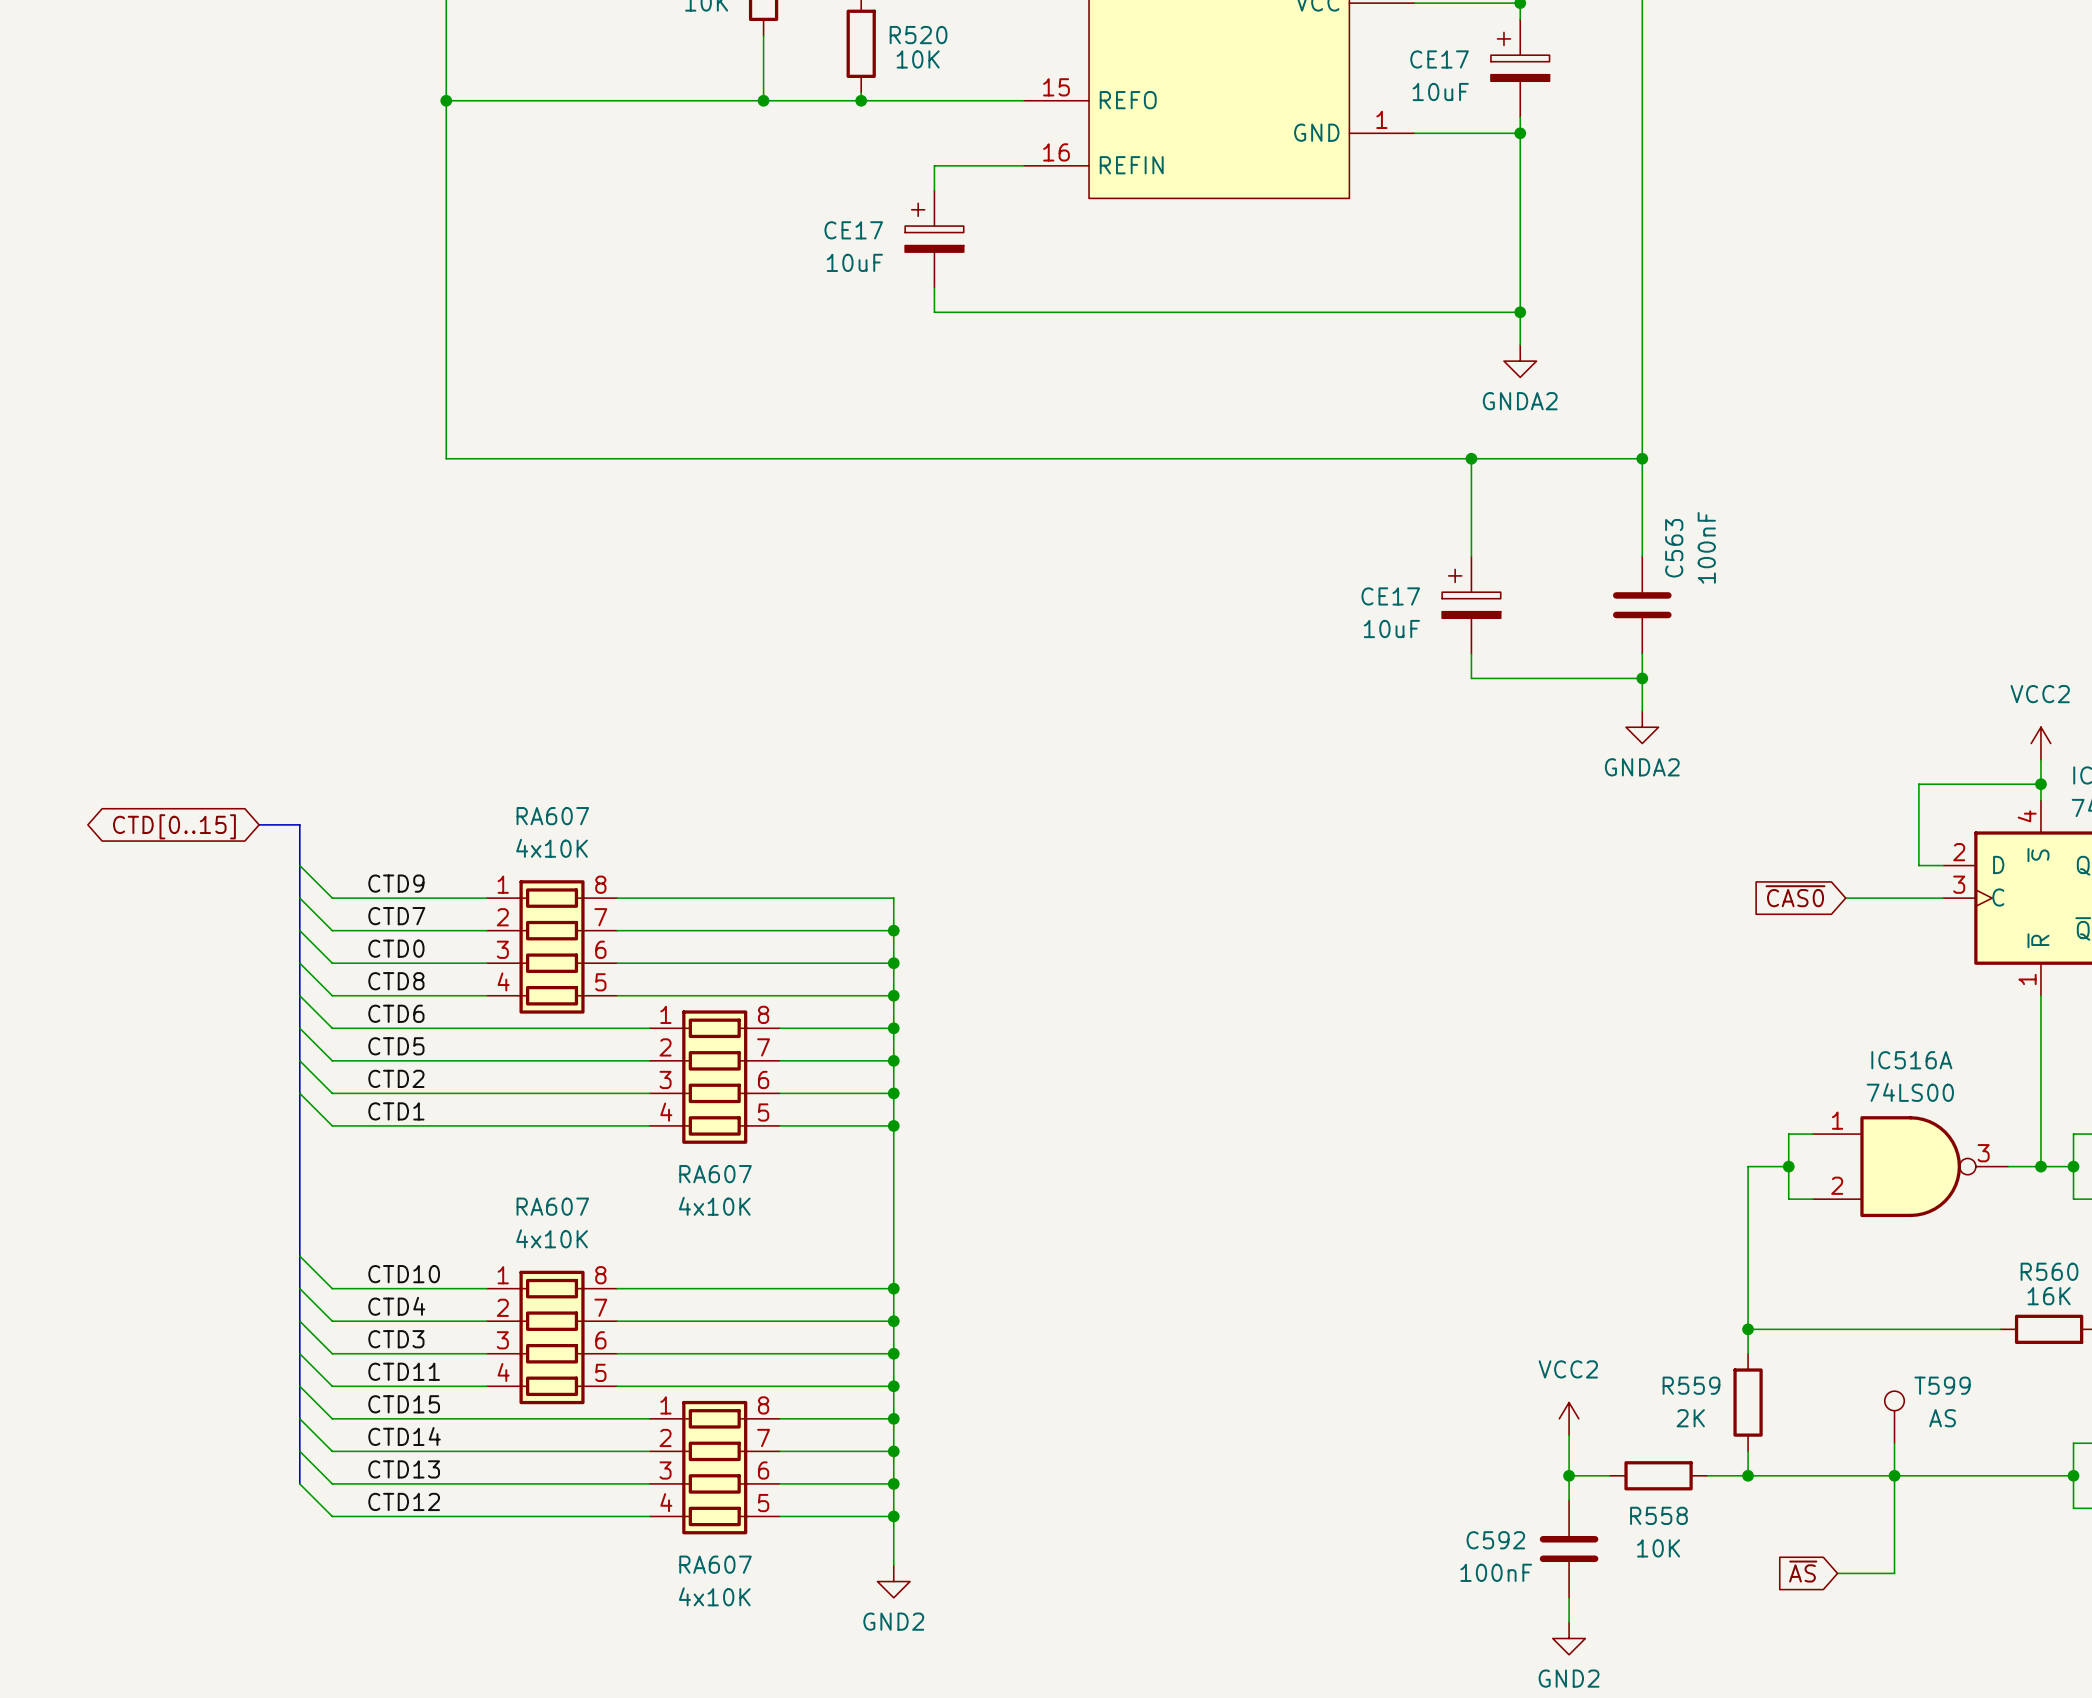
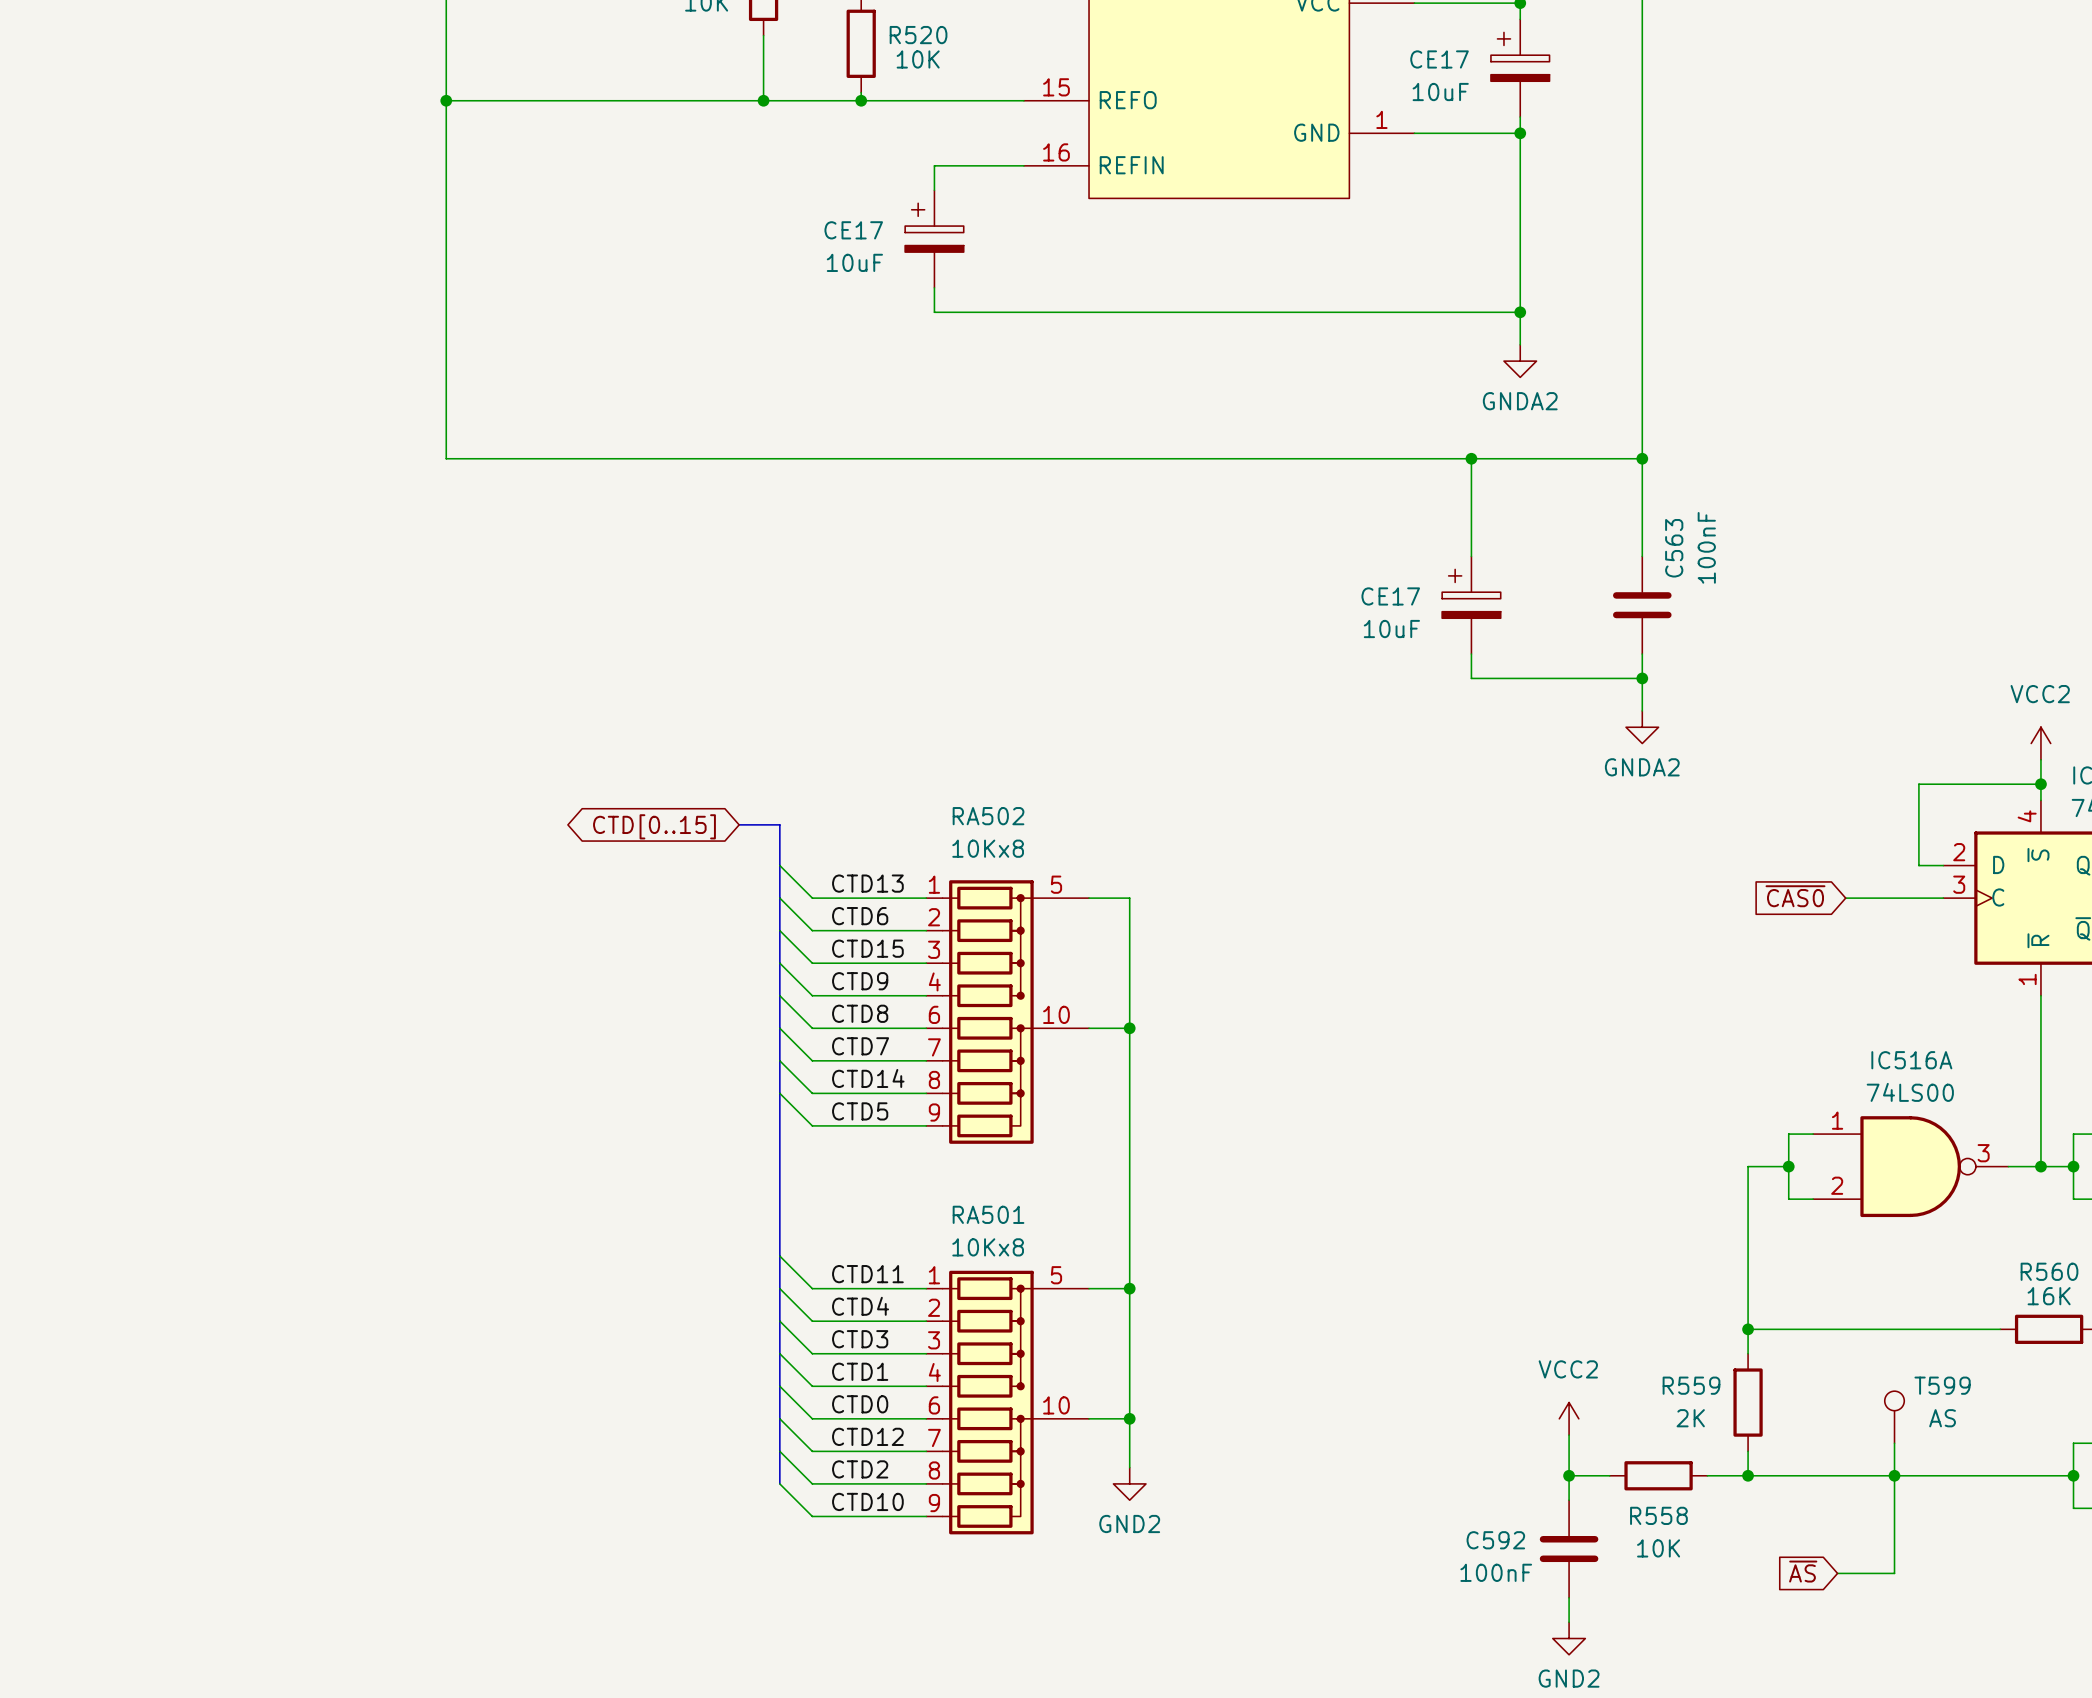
bus: (259, 824) (299, 824) (299, 1483) -> none
bus: none -> (739, 824) (779, 824) (779, 1483)
global label: CTD[0..15] (174, 826) -> none
global label: none -> CTD[0..15] (654, 826)
wire: (299, 865) (332, 898) (486, 898) -> none
label: CTD9 (396, 883) -> none
label: none -> CTD13 (867, 883)
wire: (299, 898) (332, 930) (486, 930) -> none
wire: (617, 898) (812, 898) -> (779, 865) (812, 898)
wire: (893, 898) (893, 1565) -> (893, 898) (926, 898)
wire: none -> (1089, 898) (1129, 898) (1129, 1467)
label: CTD7 (396, 916) -> none
label: none -> CTD6 (860, 916)
wire: (299, 930) (332, 963) (486, 963) -> none
wire: (617, 930) (812, 930) -> (779, 898) (812, 930)
wire: none -> (893, 930) (926, 930)
junction: (893, 930) -> none
RA607: 4x10K (552, 946) -> none
label: CTD0 (396, 948) -> none
label: none -> CTD15 (867, 948)
wire: (299, 963) (332, 995) (486, 995) -> none
wire: (617, 963) (812, 963) -> (779, 930) (812, 963)
wire: none -> (893, 963) (926, 963)
junction: (893, 963) -> none
label: CTD8 (396, 981) -> none
label: none -> CTD9 (860, 981)
wire: (299, 995) (332, 1028) (649, 1028) -> none
wire: (617, 995) (812, 995) -> (779, 963) (812, 995)
wire: none -> (893, 995) (926, 995)
junction: (893, 995) -> none
RA502: none -> 10Kx8 (1007, 1012)
label: CTD6 (396, 1013) -> none
label: none -> CTD8 (860, 1013)
wire: (299, 1028) (332, 1060) (649, 1060) -> none
wire: (779, 1028) (812, 1028) -> (779, 995) (812, 1028)
wire: none -> (893, 1028) (926, 1028)
junction: (893, 1028) -> none
wire: none -> (1089, 1028) (1129, 1028)
junction: none -> (1129, 1028)
label: CTD5 (396, 1046) -> none
label: none -> CTD7 (860, 1046)
wire: (299, 1060) (332, 1093) (649, 1093) -> none
wire: (779, 1060) (812, 1060) -> (779, 1028) (812, 1060)
wire: none -> (893, 1060) (926, 1060)
junction: (893, 1060) -> none
RA607: 4x10K (714, 1077) -> none
label: CTD2 (396, 1078) -> none
label: none -> CTD14 (868, 1078)
wire: (299, 1093) (332, 1125) (649, 1125) -> none
wire: (779, 1093) (812, 1093) -> (779, 1060) (812, 1093)
wire: none -> (893, 1093) (926, 1093)
junction: (893, 1093) -> none
label: CTD1 (396, 1111) -> none
label: none -> CTD5 (860, 1111)
wire: (779, 1125) (812, 1125) -> (779, 1093) (812, 1125)
wire: none -> (893, 1125) (926, 1125)
junction: (893, 1125) -> none
wire: (299, 1256) (332, 1288) (486, 1288) -> none
label: CTD10 (404, 1274) -> none
label: none -> CTD11 (867, 1274)
wire: (299, 1288) (332, 1321) (486, 1321) -> none
wire: (617, 1288) (812, 1288) -> (779, 1256) (812, 1288)
wire: none -> (893, 1288) (926, 1288)
junction: (893, 1288) -> none
wire: none -> (1089, 1288) (1129, 1288)
junction: none -> (1129, 1288)
label: CTD4 (396, 1306) -> none
label: none -> CTD4 (860, 1306)
wire: (299, 1321) (332, 1353) (486, 1353) -> none
wire: (617, 1321) (812, 1321) -> (779, 1288) (812, 1321)
wire: none -> (893, 1321) (926, 1321)
junction: (893, 1321) -> none
RA607: 4x10K (552, 1337) -> none
label: CTD3 (396, 1339) -> none
label: none -> CTD3 (860, 1339)
wire: (299, 1353) (332, 1386) (486, 1386) -> none
wire: (617, 1353) (812, 1353) -> (779, 1321) (812, 1353)
wire: none -> (893, 1353) (926, 1353)
junction: (893, 1353) -> none
label: CTD11 (404, 1371) -> none
label: none -> CTD1 (860, 1371)
wire: (299, 1386) (332, 1418) (649, 1418) -> none
wire: (617, 1386) (812, 1386) -> (779, 1353) (812, 1386)
wire: none -> (893, 1386) (926, 1386)
junction: (893, 1386) -> none
RA501: none -> 10Kx8 (1007, 1402)
label: CTD15 (404, 1404) -> none
label: none -> CTD0 (860, 1404)
wire: (299, 1418) (332, 1451) (649, 1451) -> none
wire: (779, 1418) (812, 1418) -> (779, 1386) (812, 1418)
wire: none -> (893, 1418) (926, 1418)
junction: (893, 1418) -> none
wire: none -> (1089, 1418) (1129, 1418)
junction: none -> (1129, 1418)
label: CTD14 (404, 1436) -> none
label: none -> CTD12 (867, 1436)
wire: (299, 1451) (332, 1483) (649, 1483) -> none
wire: (779, 1451) (812, 1451) -> (779, 1418) (812, 1451)
wire: none -> (893, 1451) (926, 1451)
junction: (893, 1451) -> none
RA607: 4x10K (714, 1467) -> none
label: CTD13 (404, 1469) -> none
label: none -> CTD2 (860, 1469)
wire: (299, 1483) (332, 1516) (649, 1516) -> none
wire: (779, 1483) (812, 1483) -> (779, 1451) (812, 1483)
wire: none -> (893, 1483) (926, 1483)
junction: (893, 1483) -> none
label: CTD12 (404, 1501) -> none
label: none -> CTD10 (867, 1501)
wire: (779, 1516) (812, 1516) -> (779, 1483) (812, 1516)
wire: none -> (893, 1516) (926, 1516)
junction: (893, 1516) -> none
power symbol position: GND2 (893, 1581) -> GND2 (1129, 1483)

